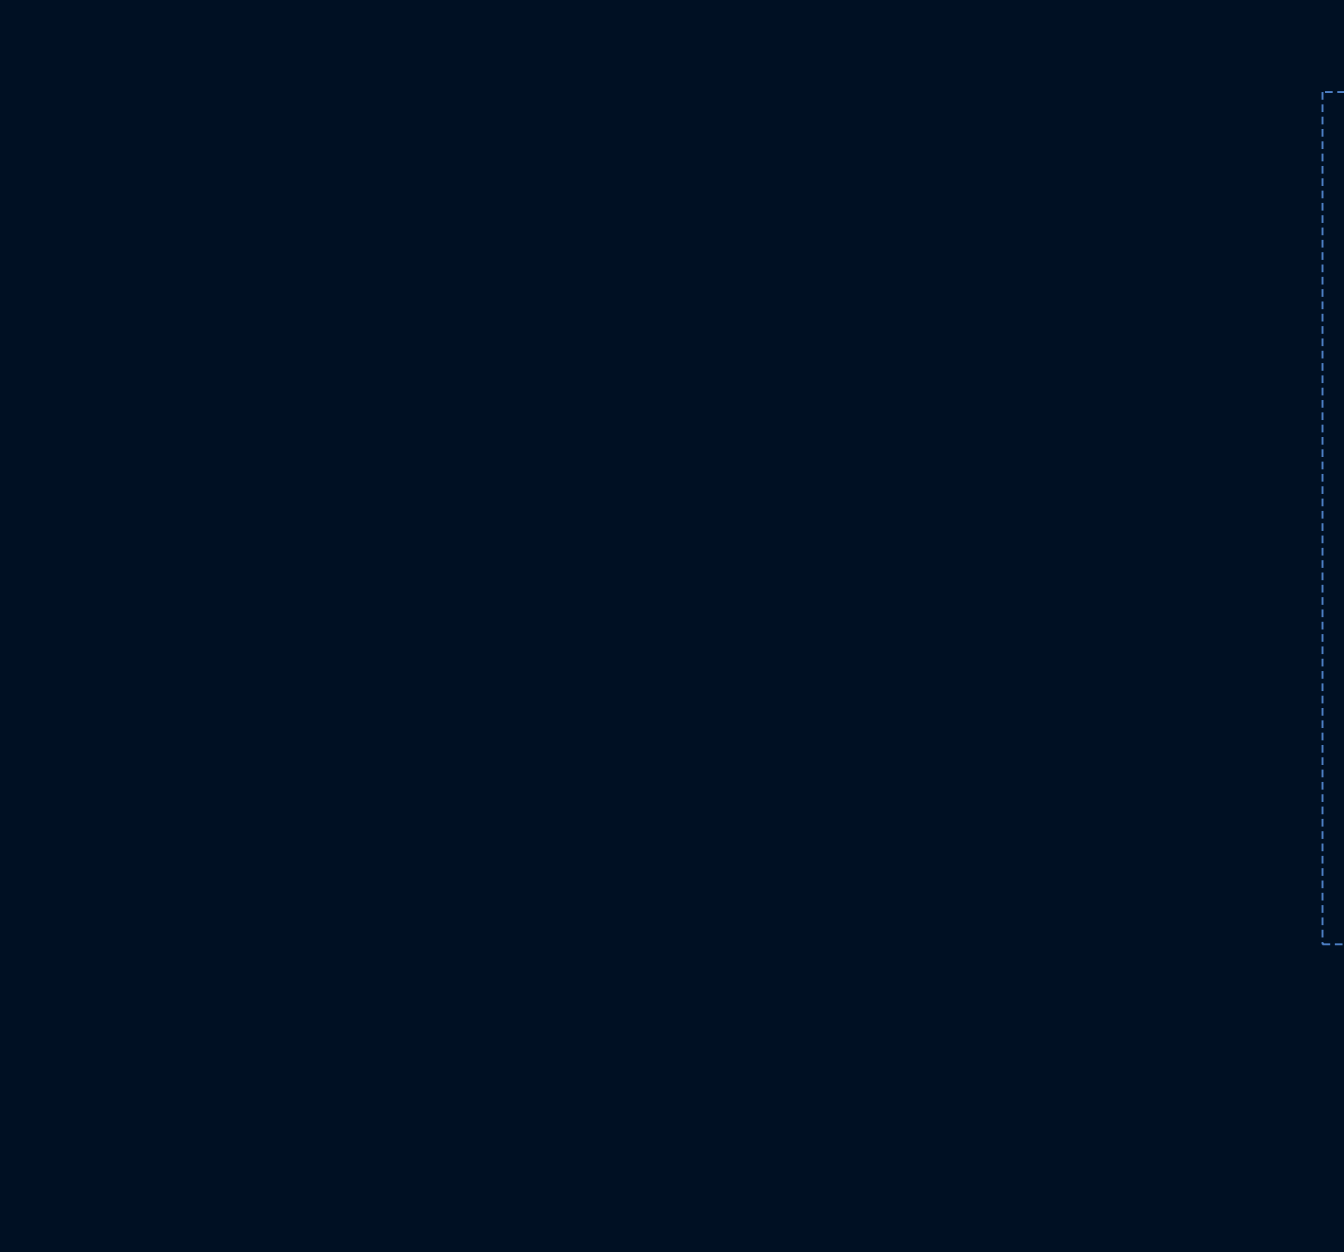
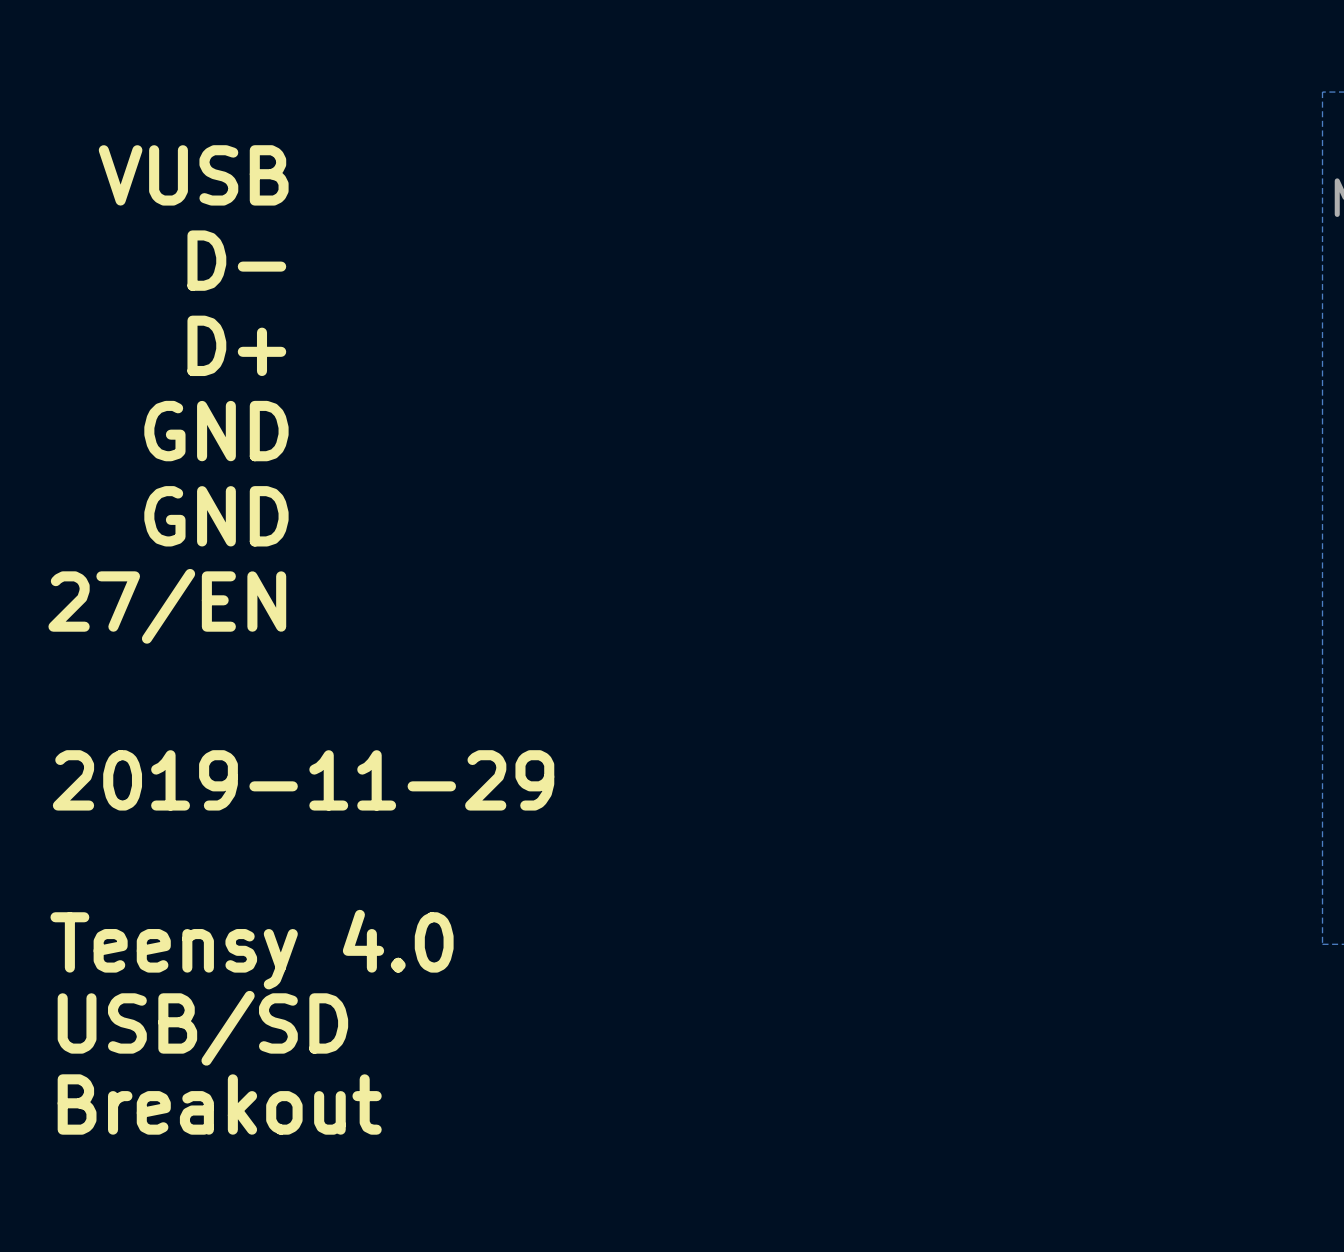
text: none -> VUSB (193, 175)
text: none -> D- (236, 260)
text: none -> D+ (236, 345)
text: none -> GND (216, 431)
text: none -> GND (216, 516)
text: none -> 27/EN (167, 606)
text: none -> 2019-11-29 (303, 780)
text: none -> Teensy 4.0 (252, 949)
text: none -> USB/SD (202, 1028)
text: none -> Breakout (219, 1104)

